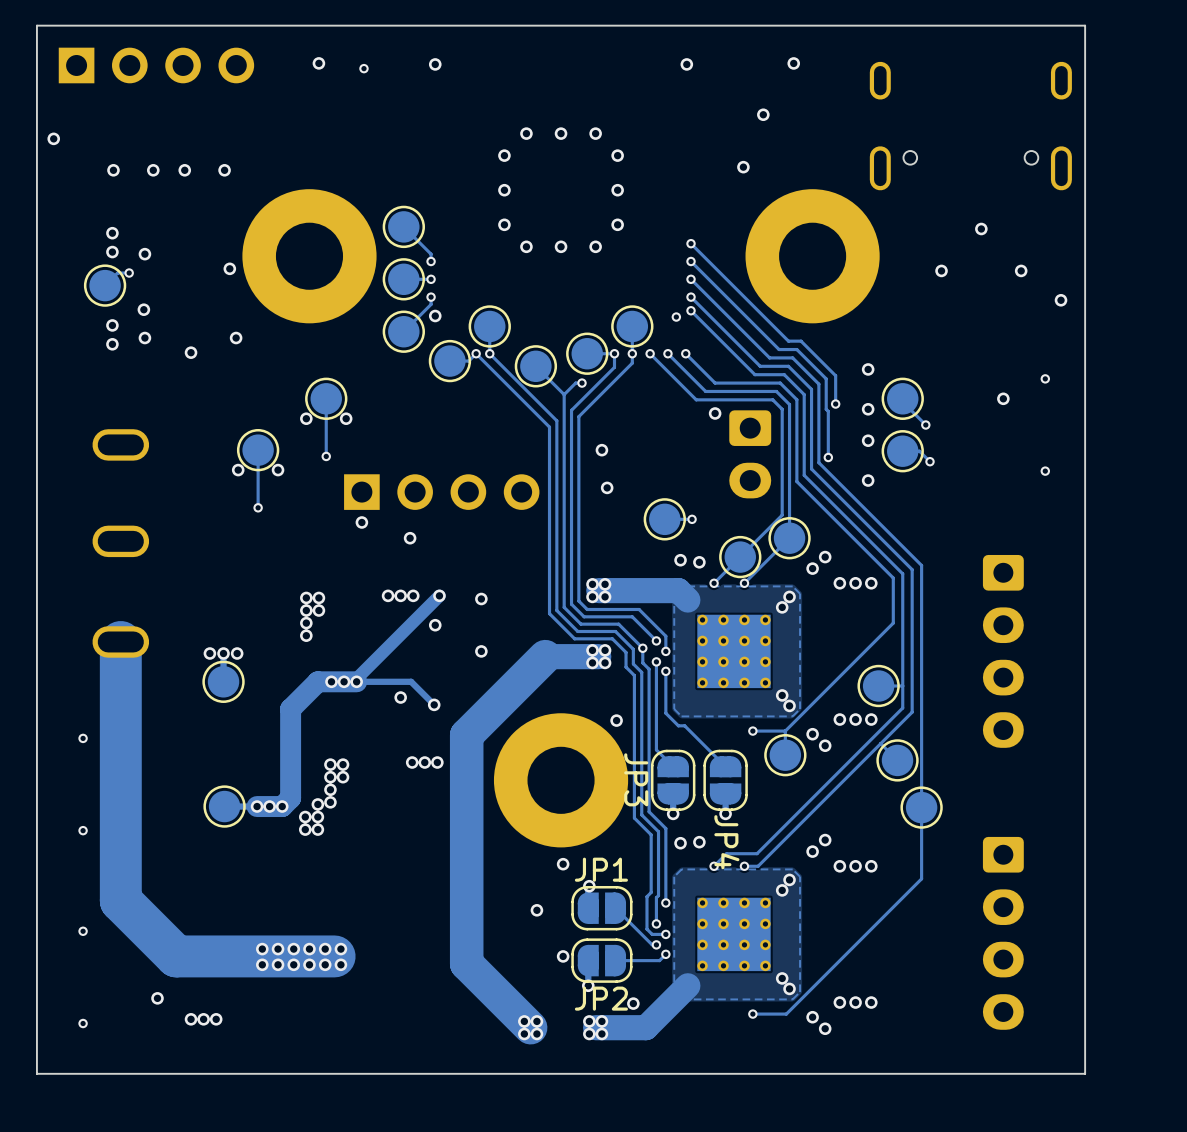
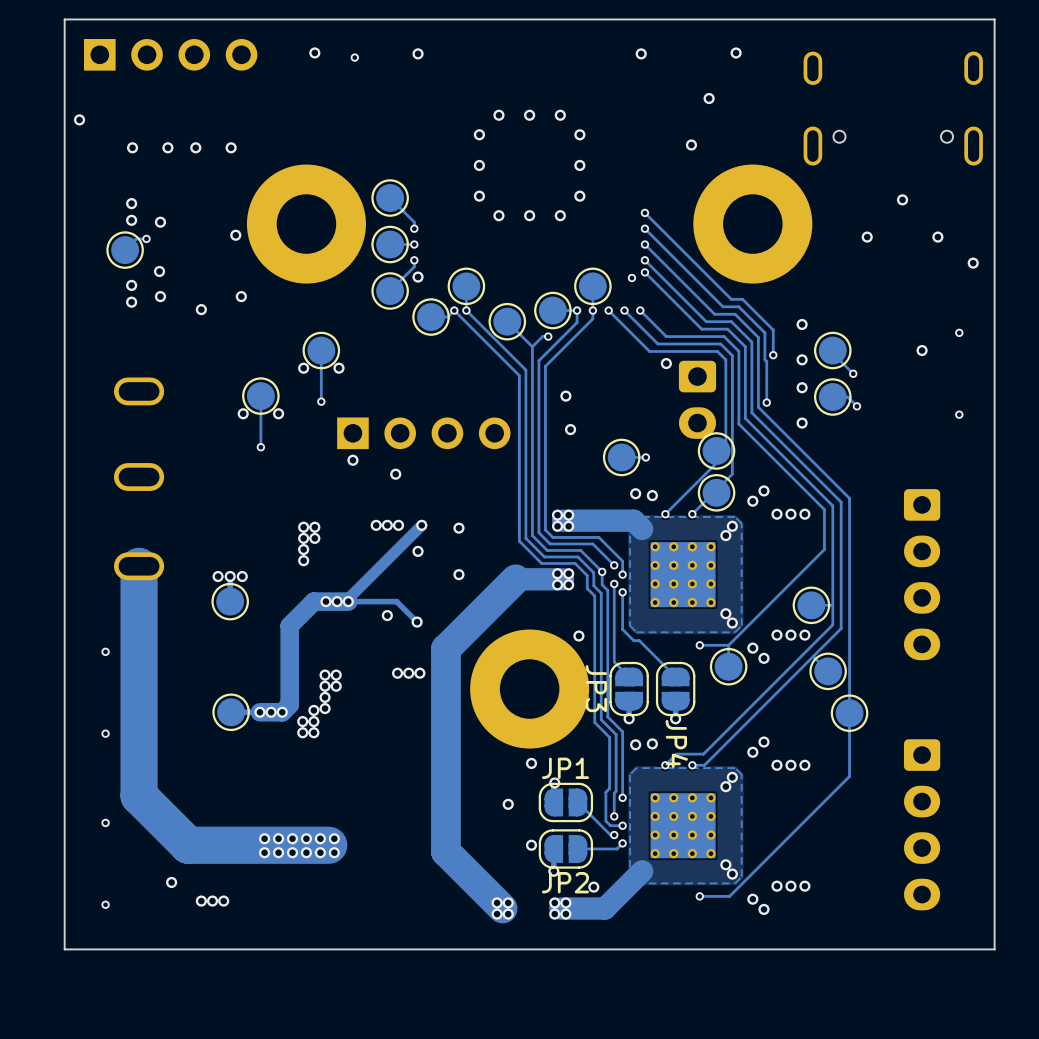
part: none -> (716, 450)
part: (789, 538) -> none
part: (740, 557) -> none
part: none -> (716, 492)

